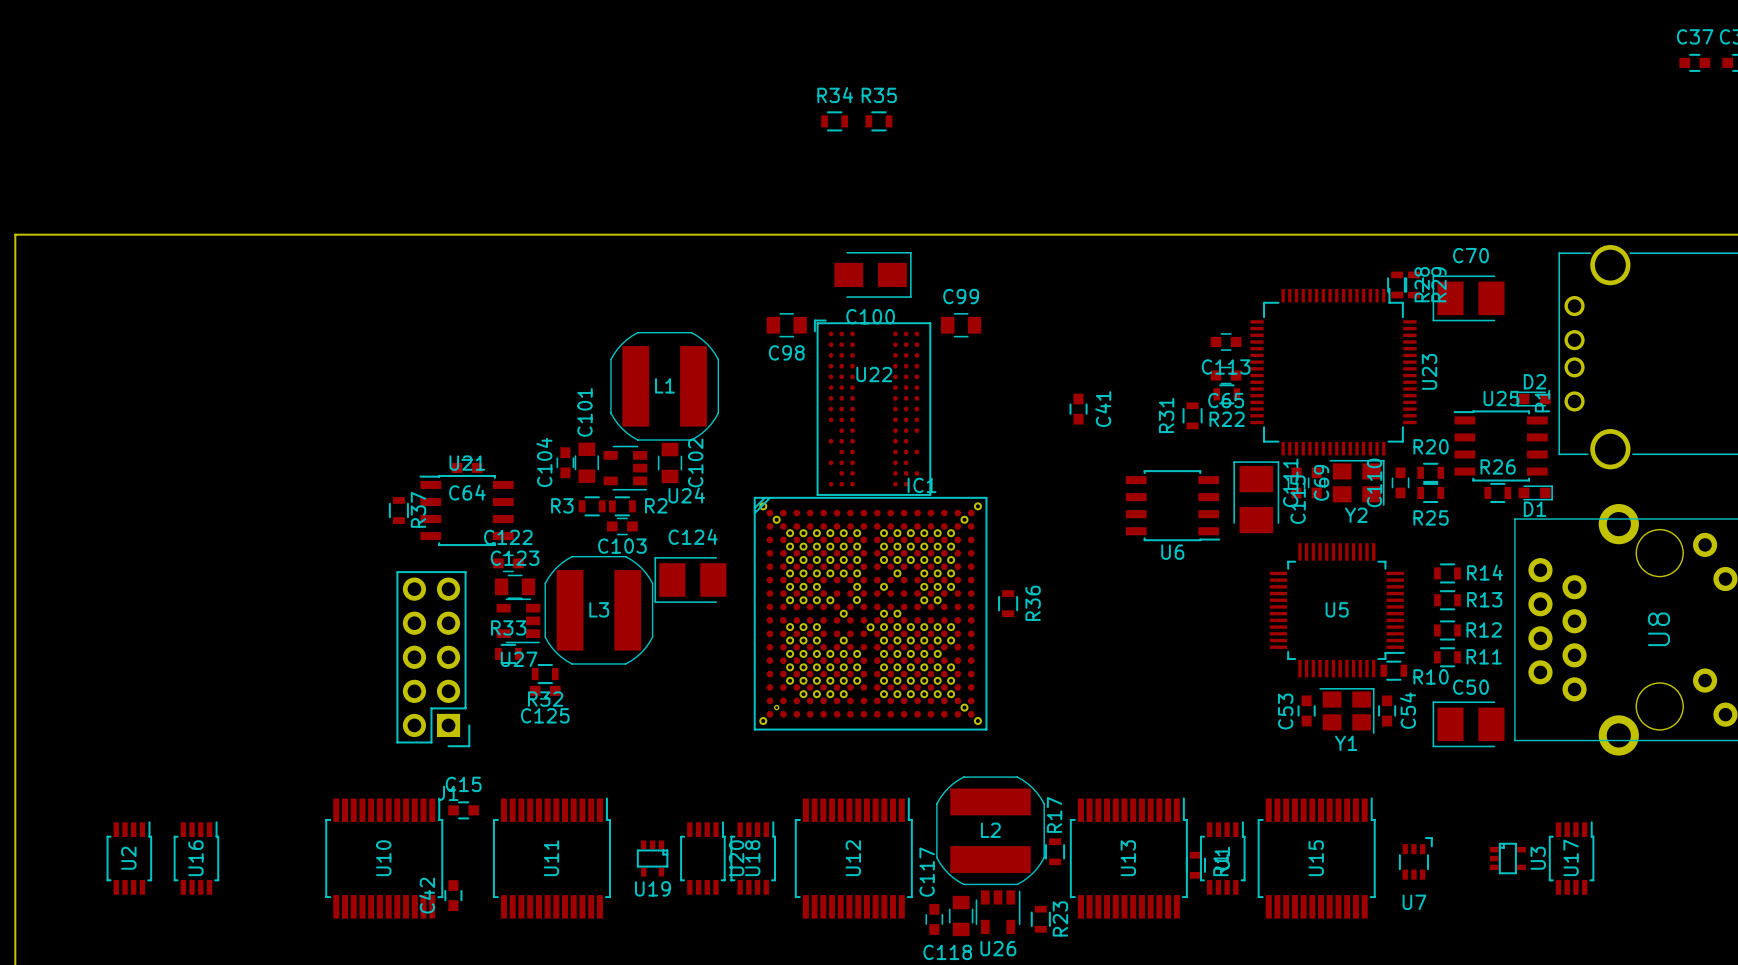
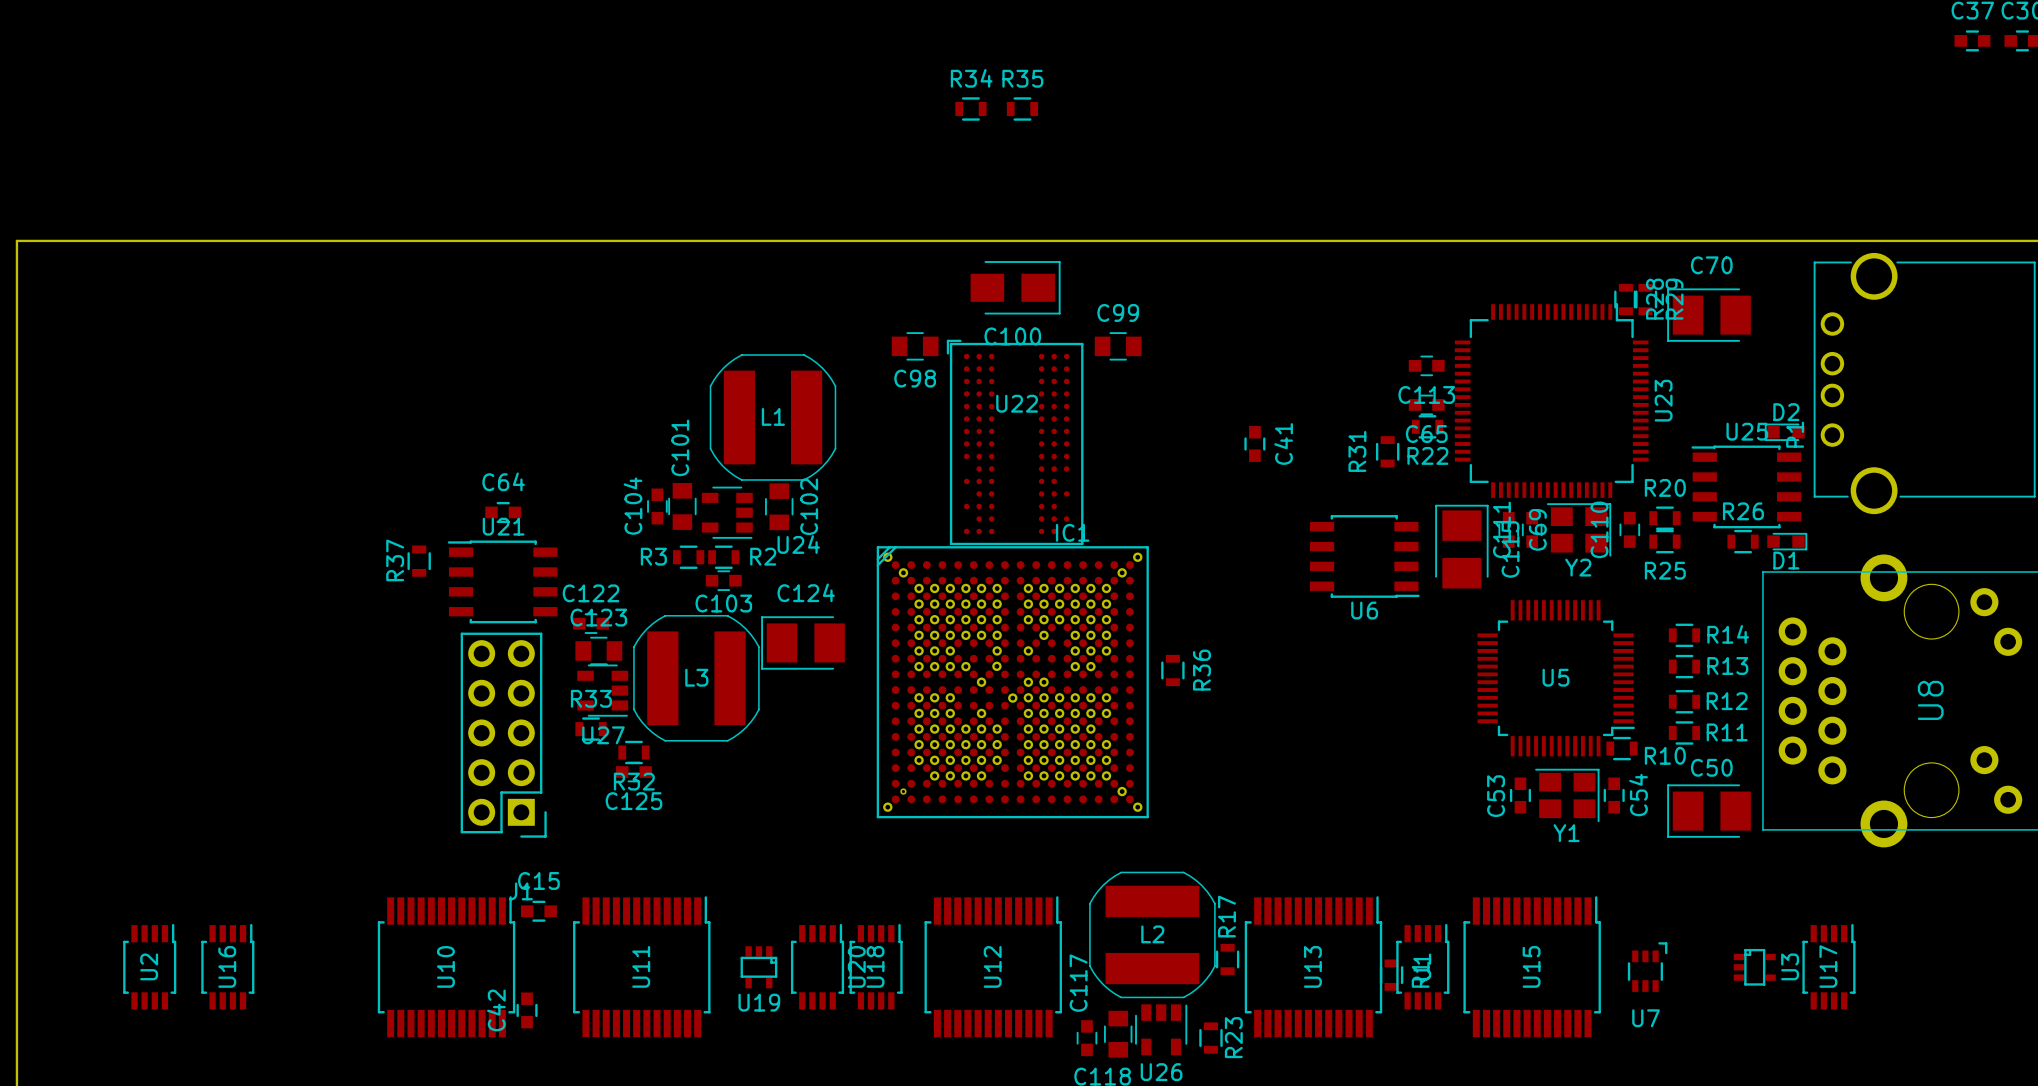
C64 position: (467, 467) -> (503, 512)
C64 name position: C64 (467, 492) -> C64 (503, 481)
R37 name position: R37 (418, 509) -> R37 (395, 560)
R37 position: (398, 510) -> (419, 561)
U21 position: (466, 510) -> (502, 581)

